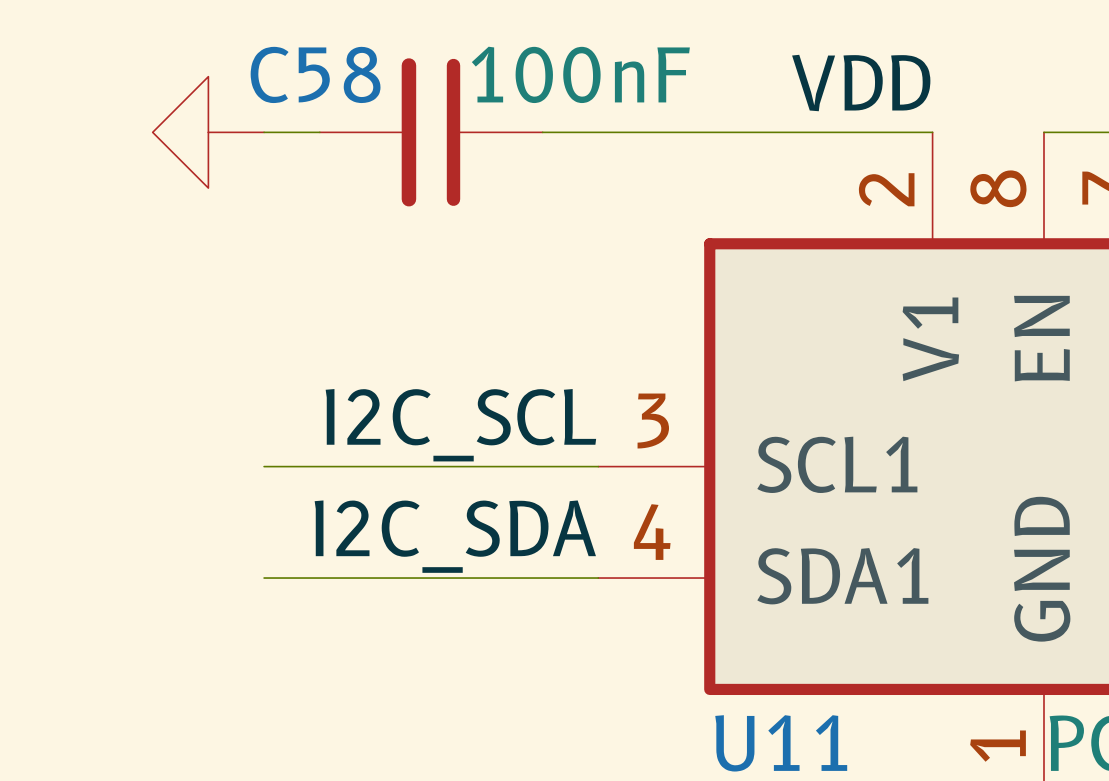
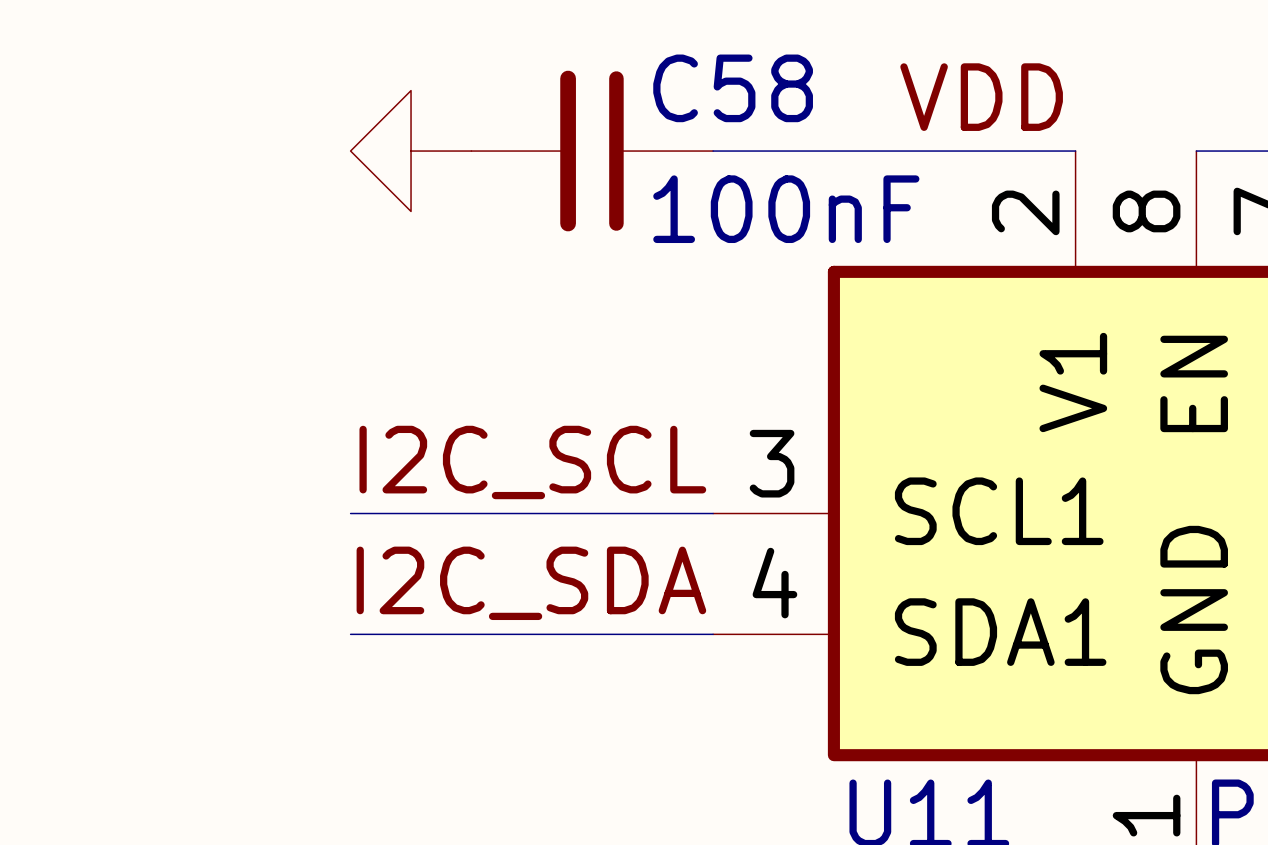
C58 name position: C58 (315, 74) -> C58 (733, 88)
C58 value position: 100nF (580, 74) -> 100nF (786, 209)
power symbol position: (208, 132) -> (411, 151)
wire: (264, 132) (319, 132) -> none
C58 position: (431, 132) -> (592, 151)

